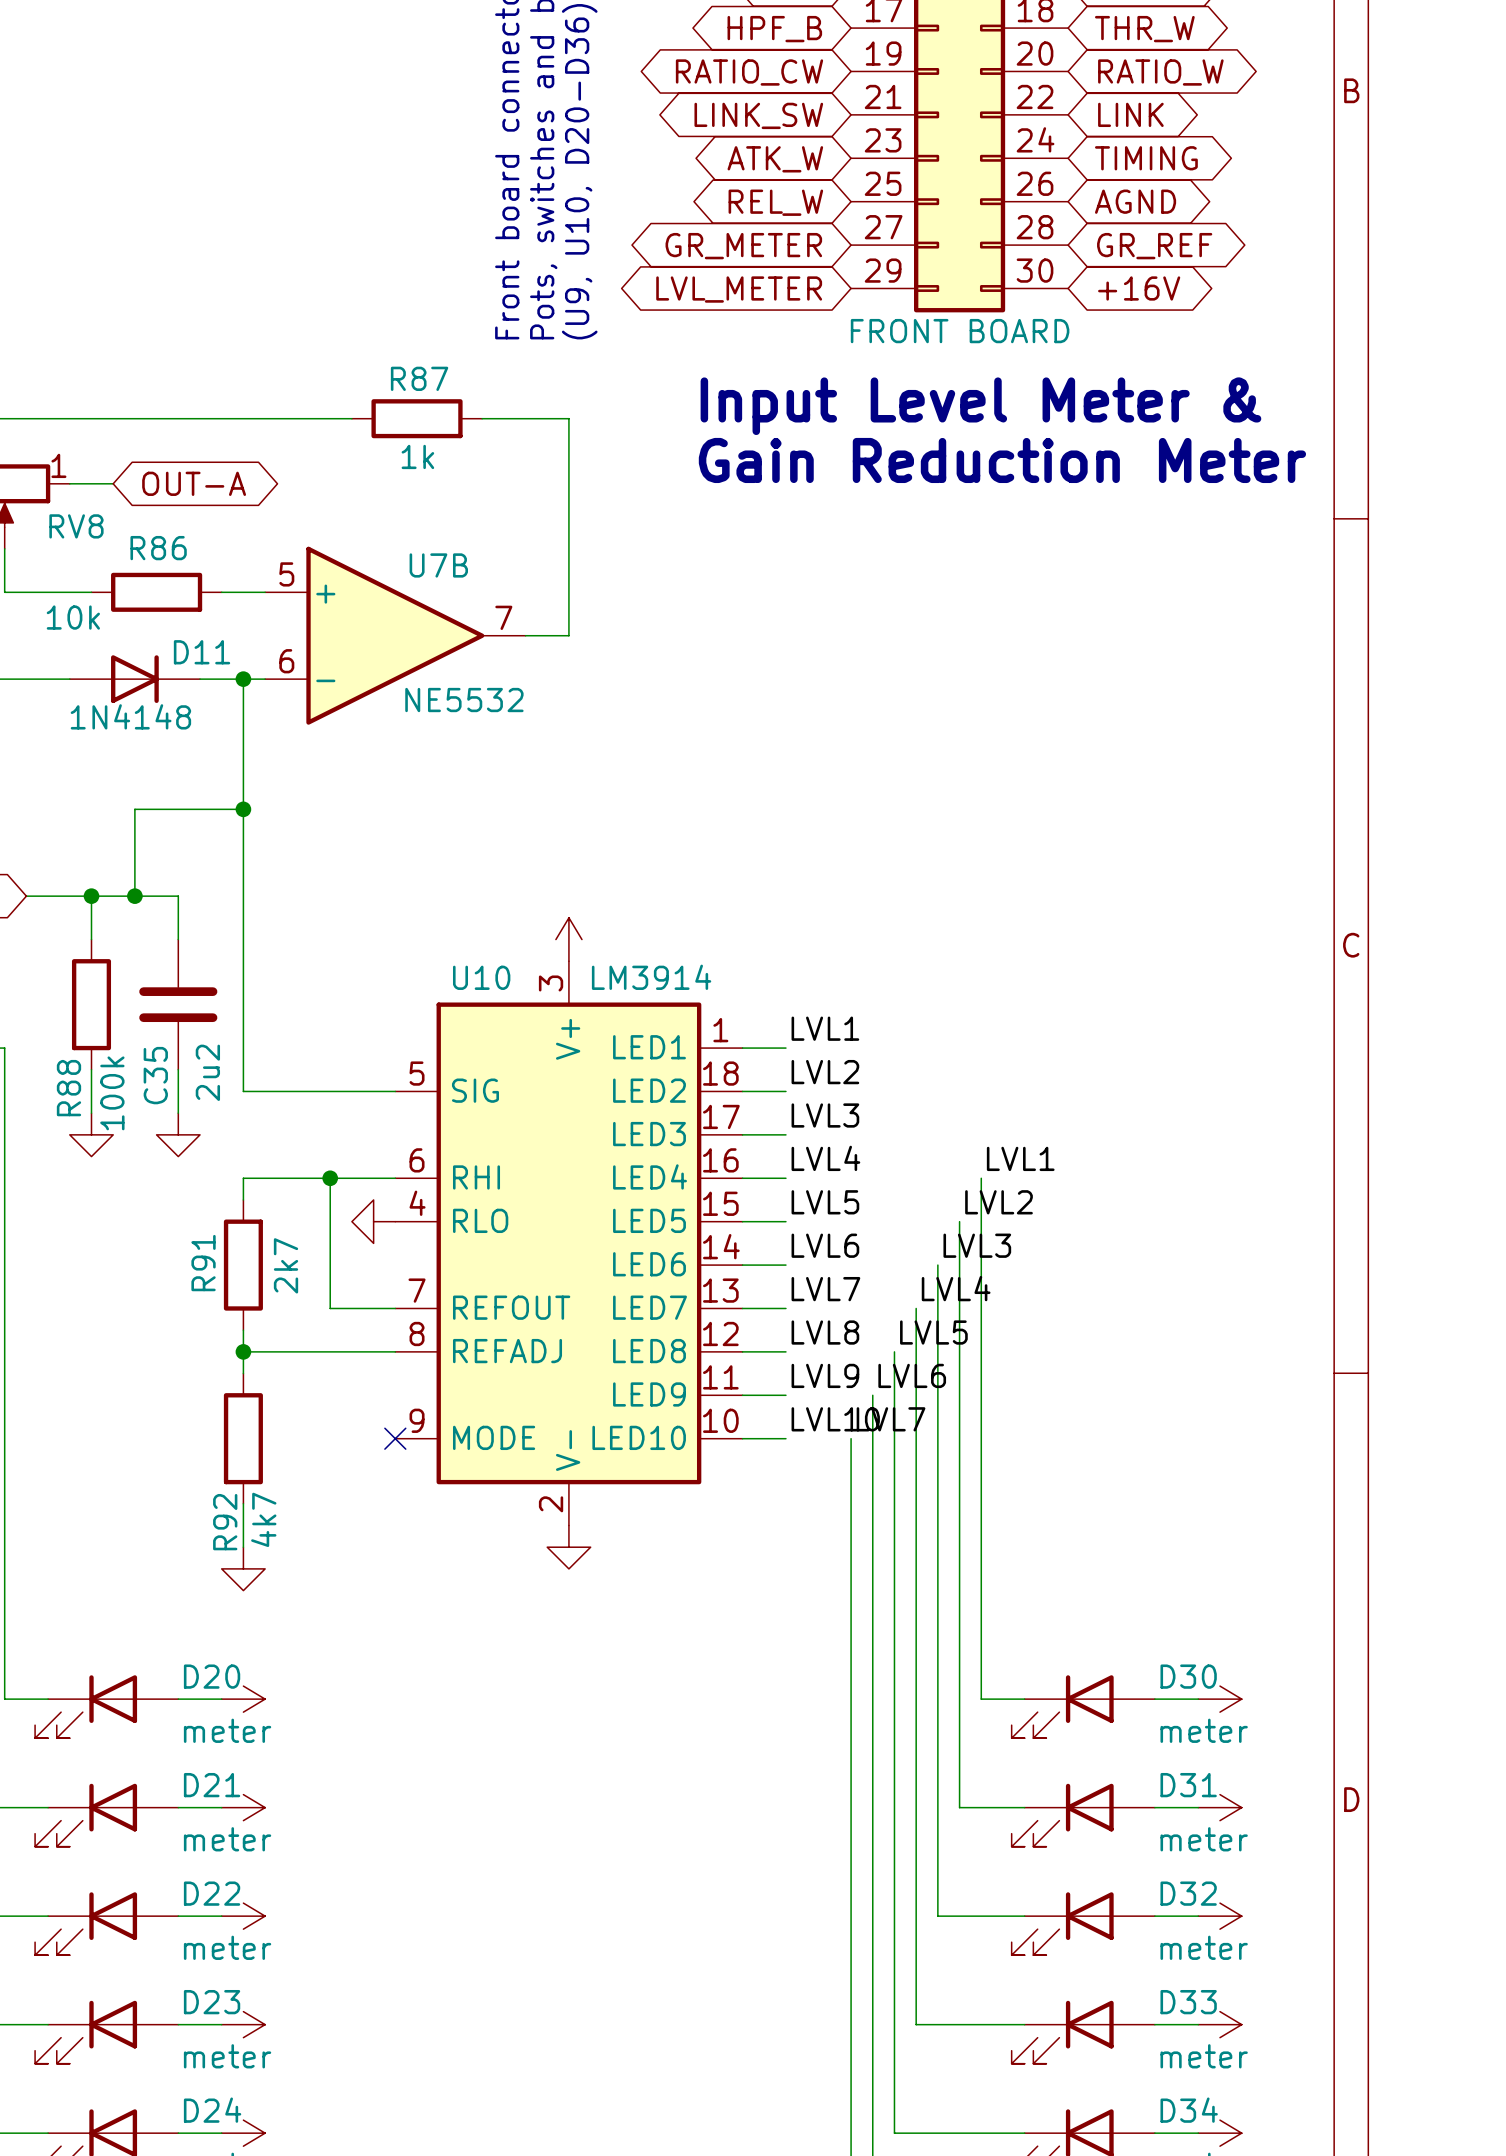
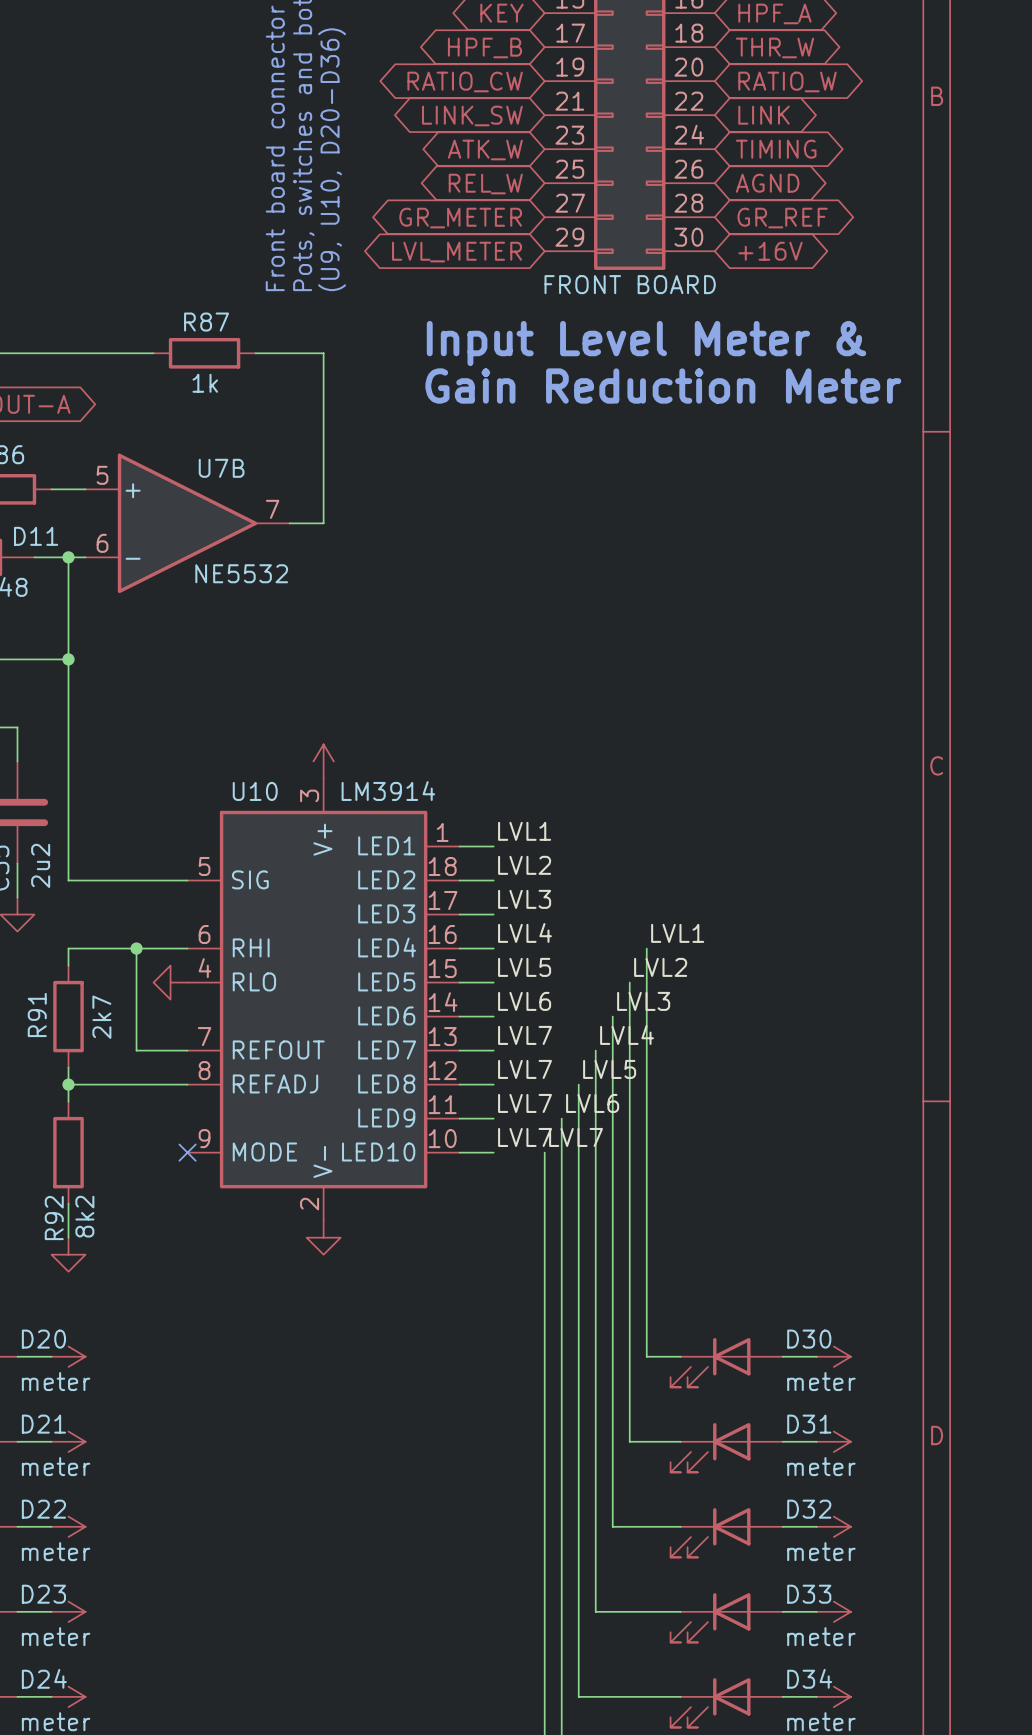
label: LVL8 (825, 1332) -> LVL7 (524, 1069)
label: LVL9 (825, 1375) -> LVL7 (524, 1103)
label: LVL10 (835, 1419) -> LVL7 (524, 1137)
R92 value: 4k7 (263, 1519) -> 8k2 (84, 1216)

